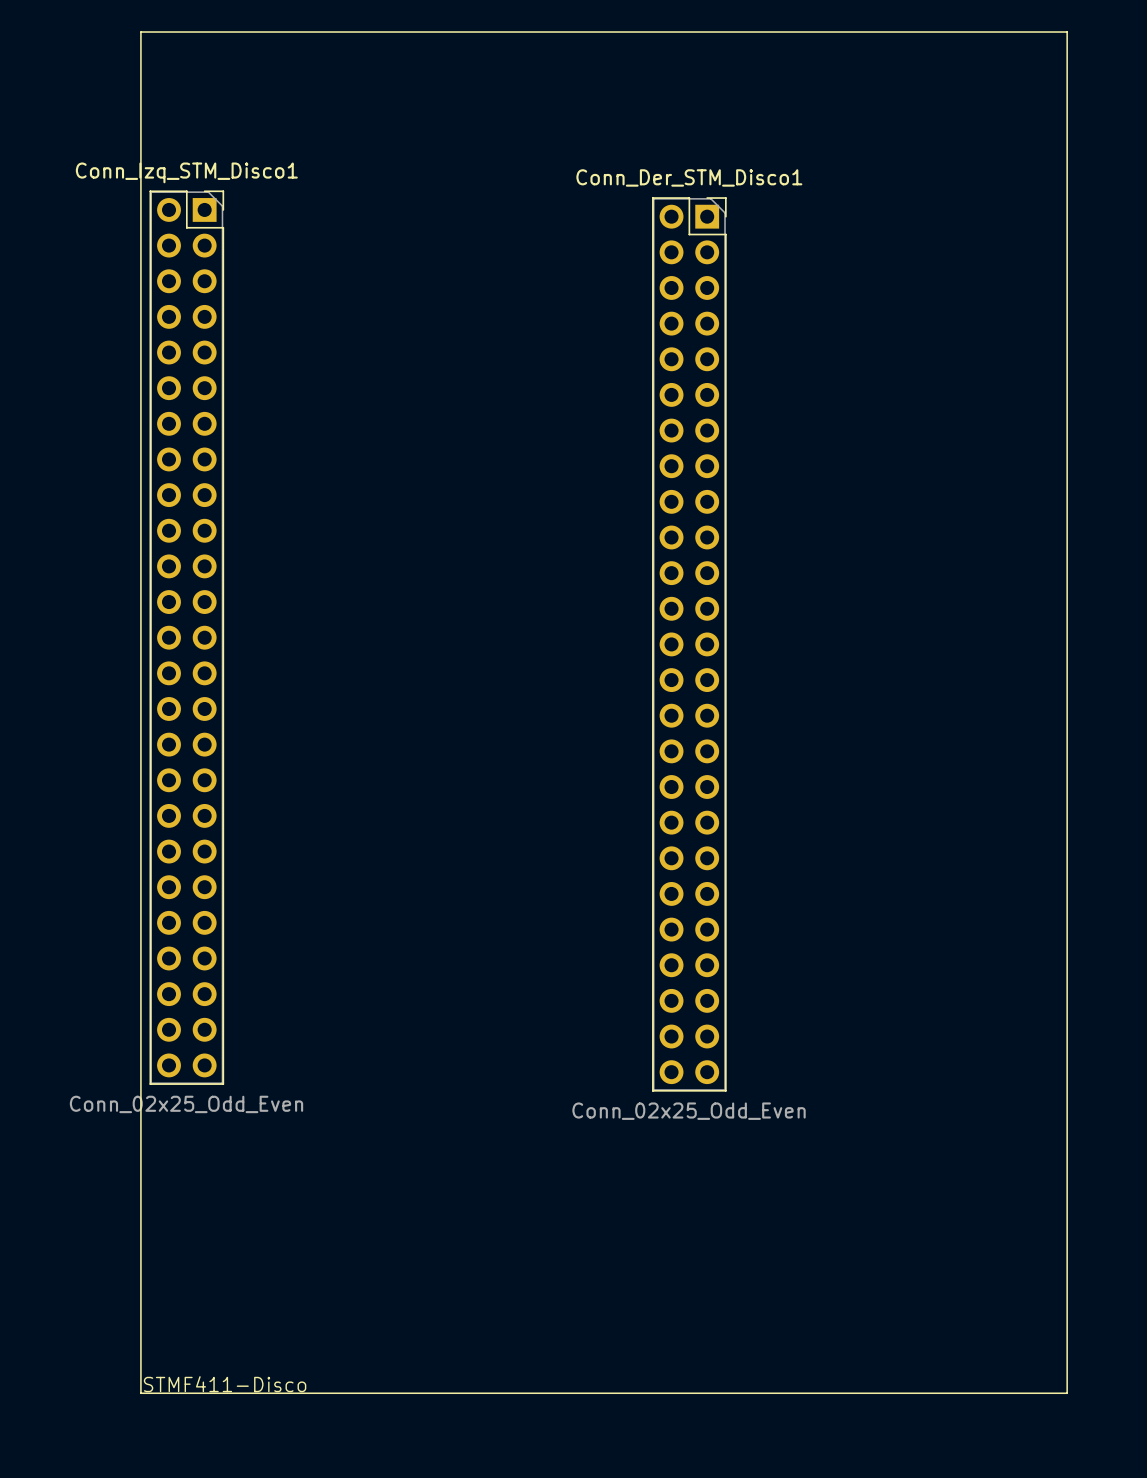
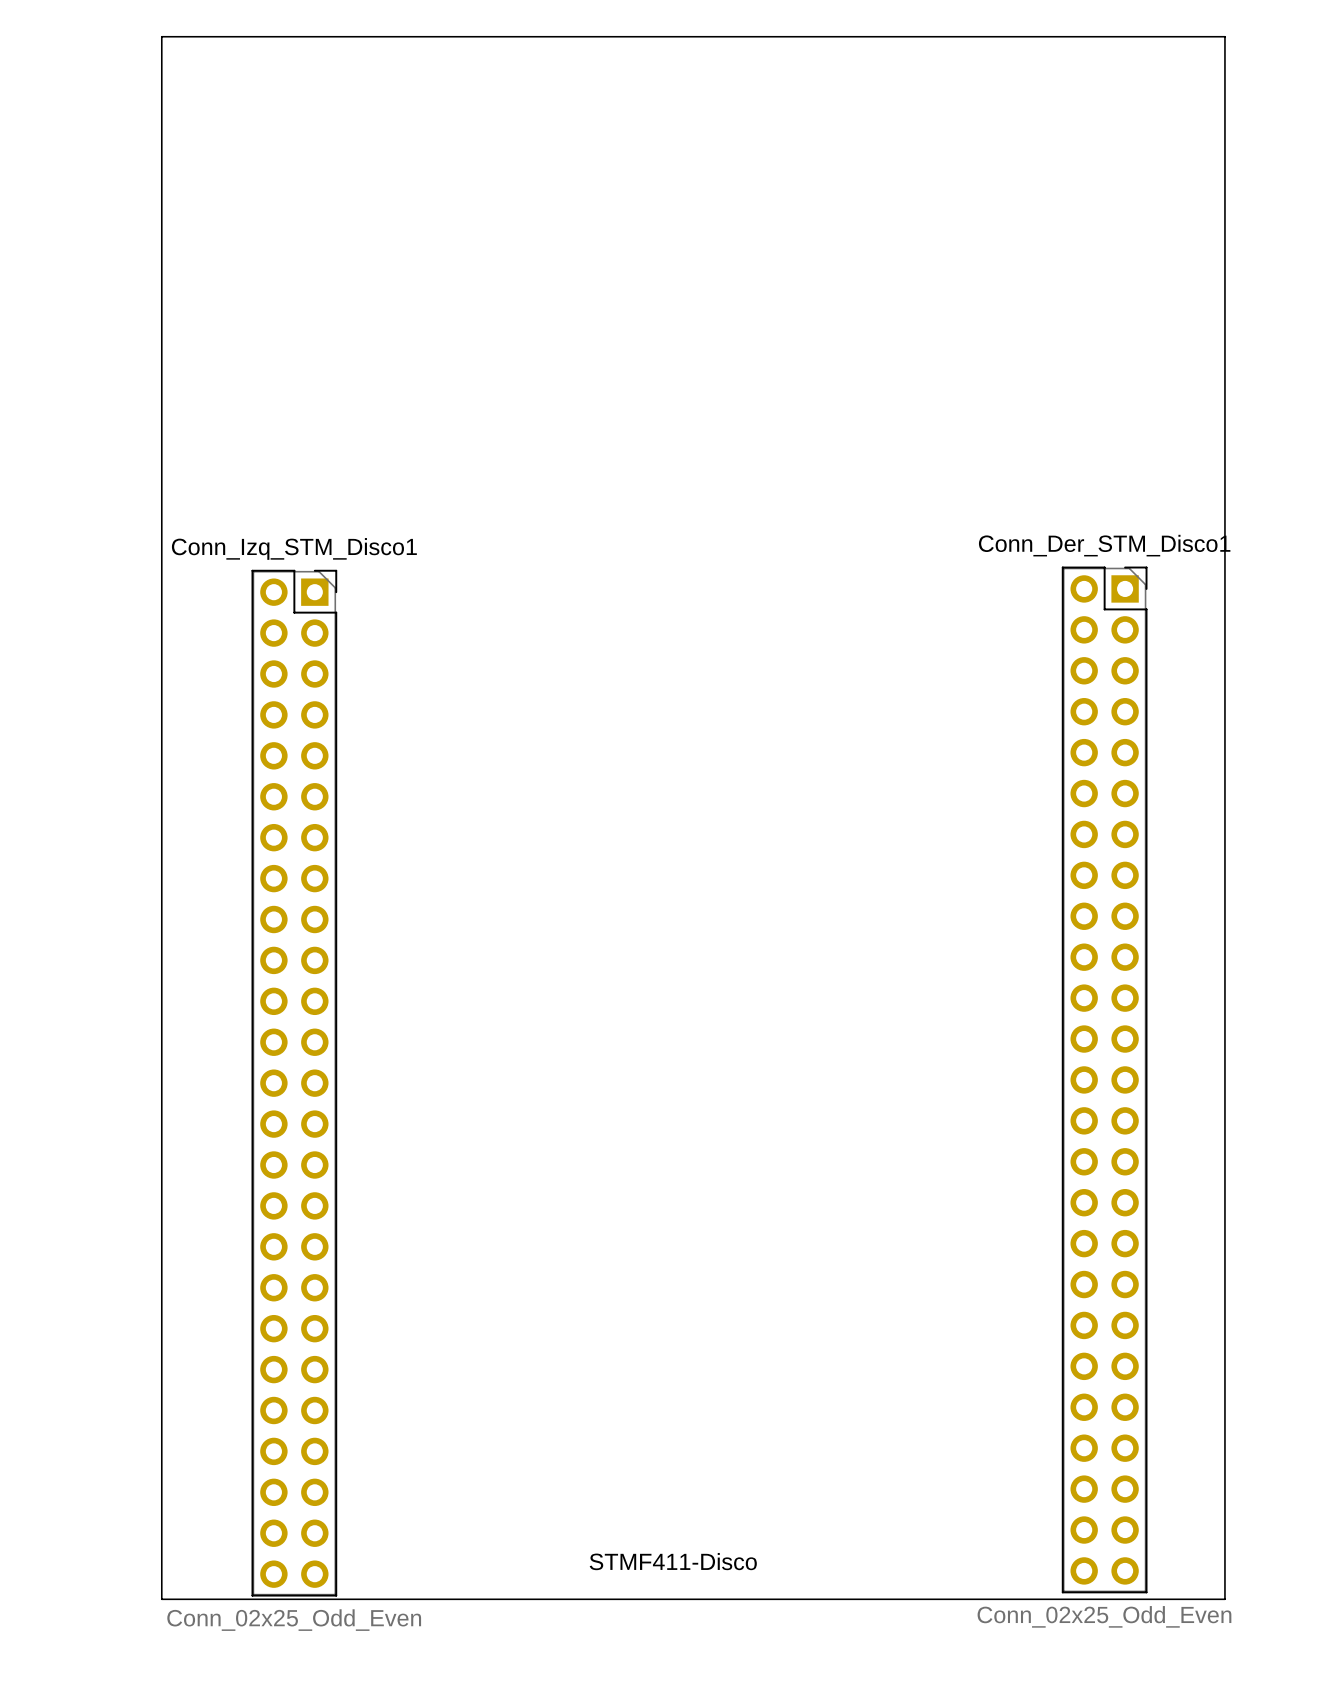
Conn_Izq_STM_Disco1 position: (186, 637) -> (294, 1083)
Conn_Der_STM_Disco1 position: (689, 644) -> (1104, 1079)
text: none -> STMF411-Disco (673, 1561)
text: STMF411-Disco (225, 1384) -> none

